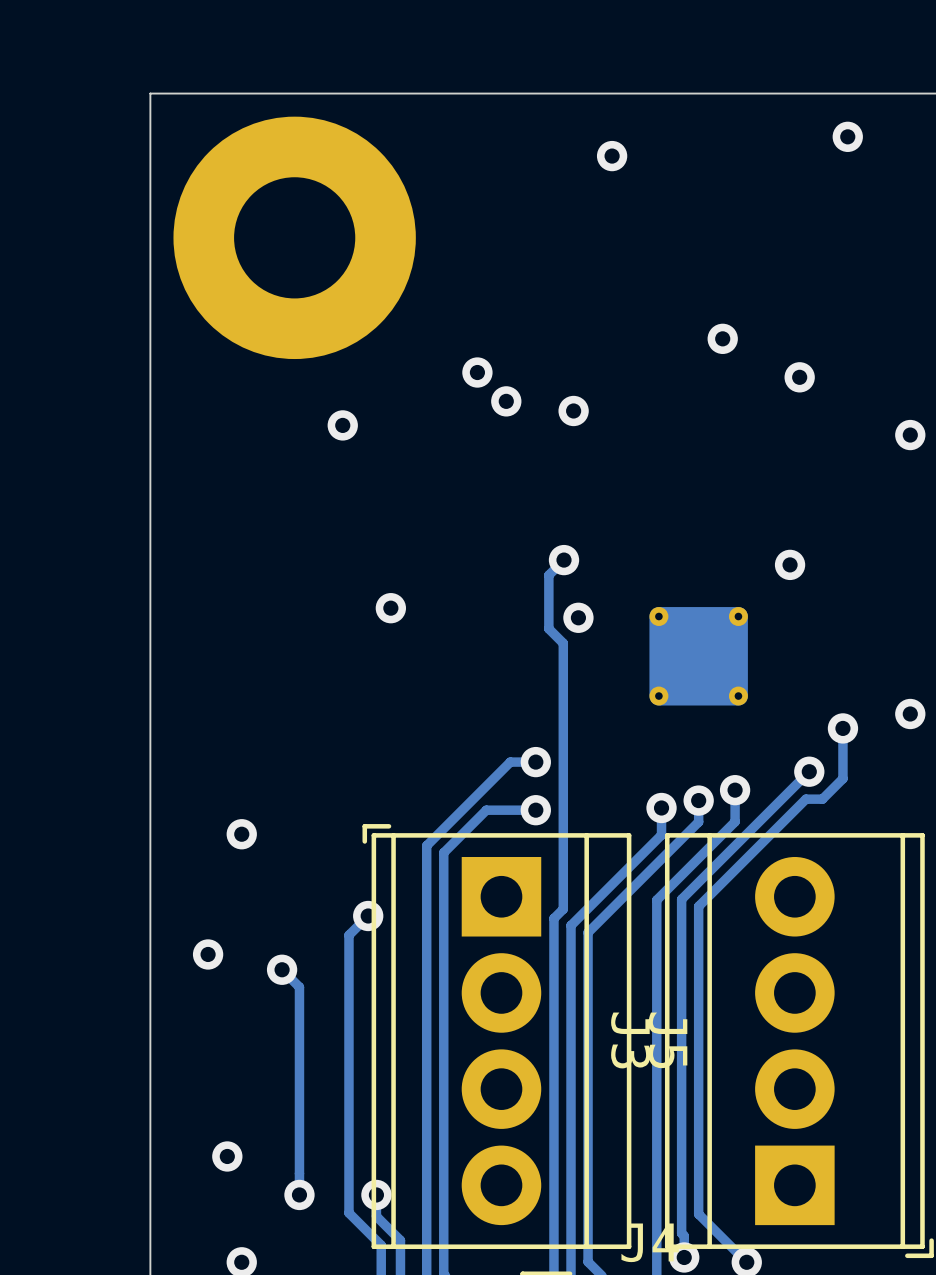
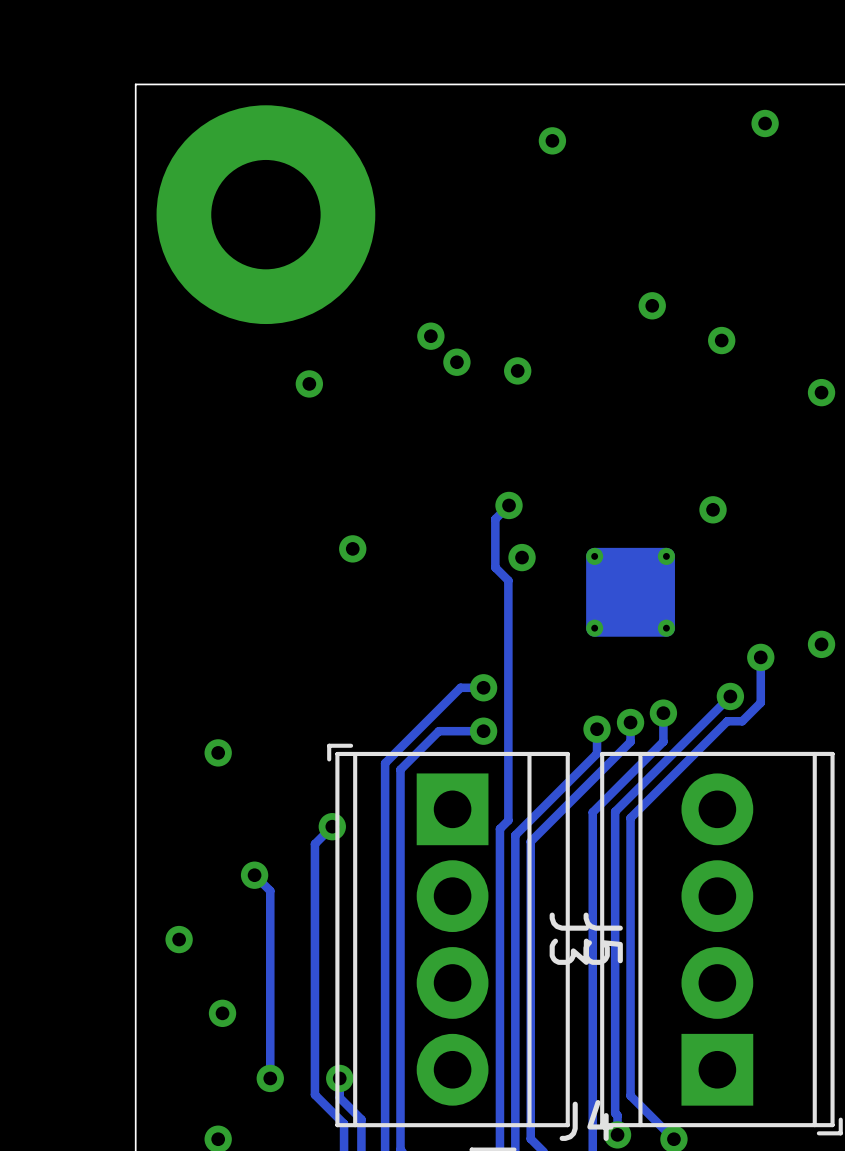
via: (208, 954) -> none
via: none -> (179, 939)
via position: (227, 1156) -> (222, 1013)

